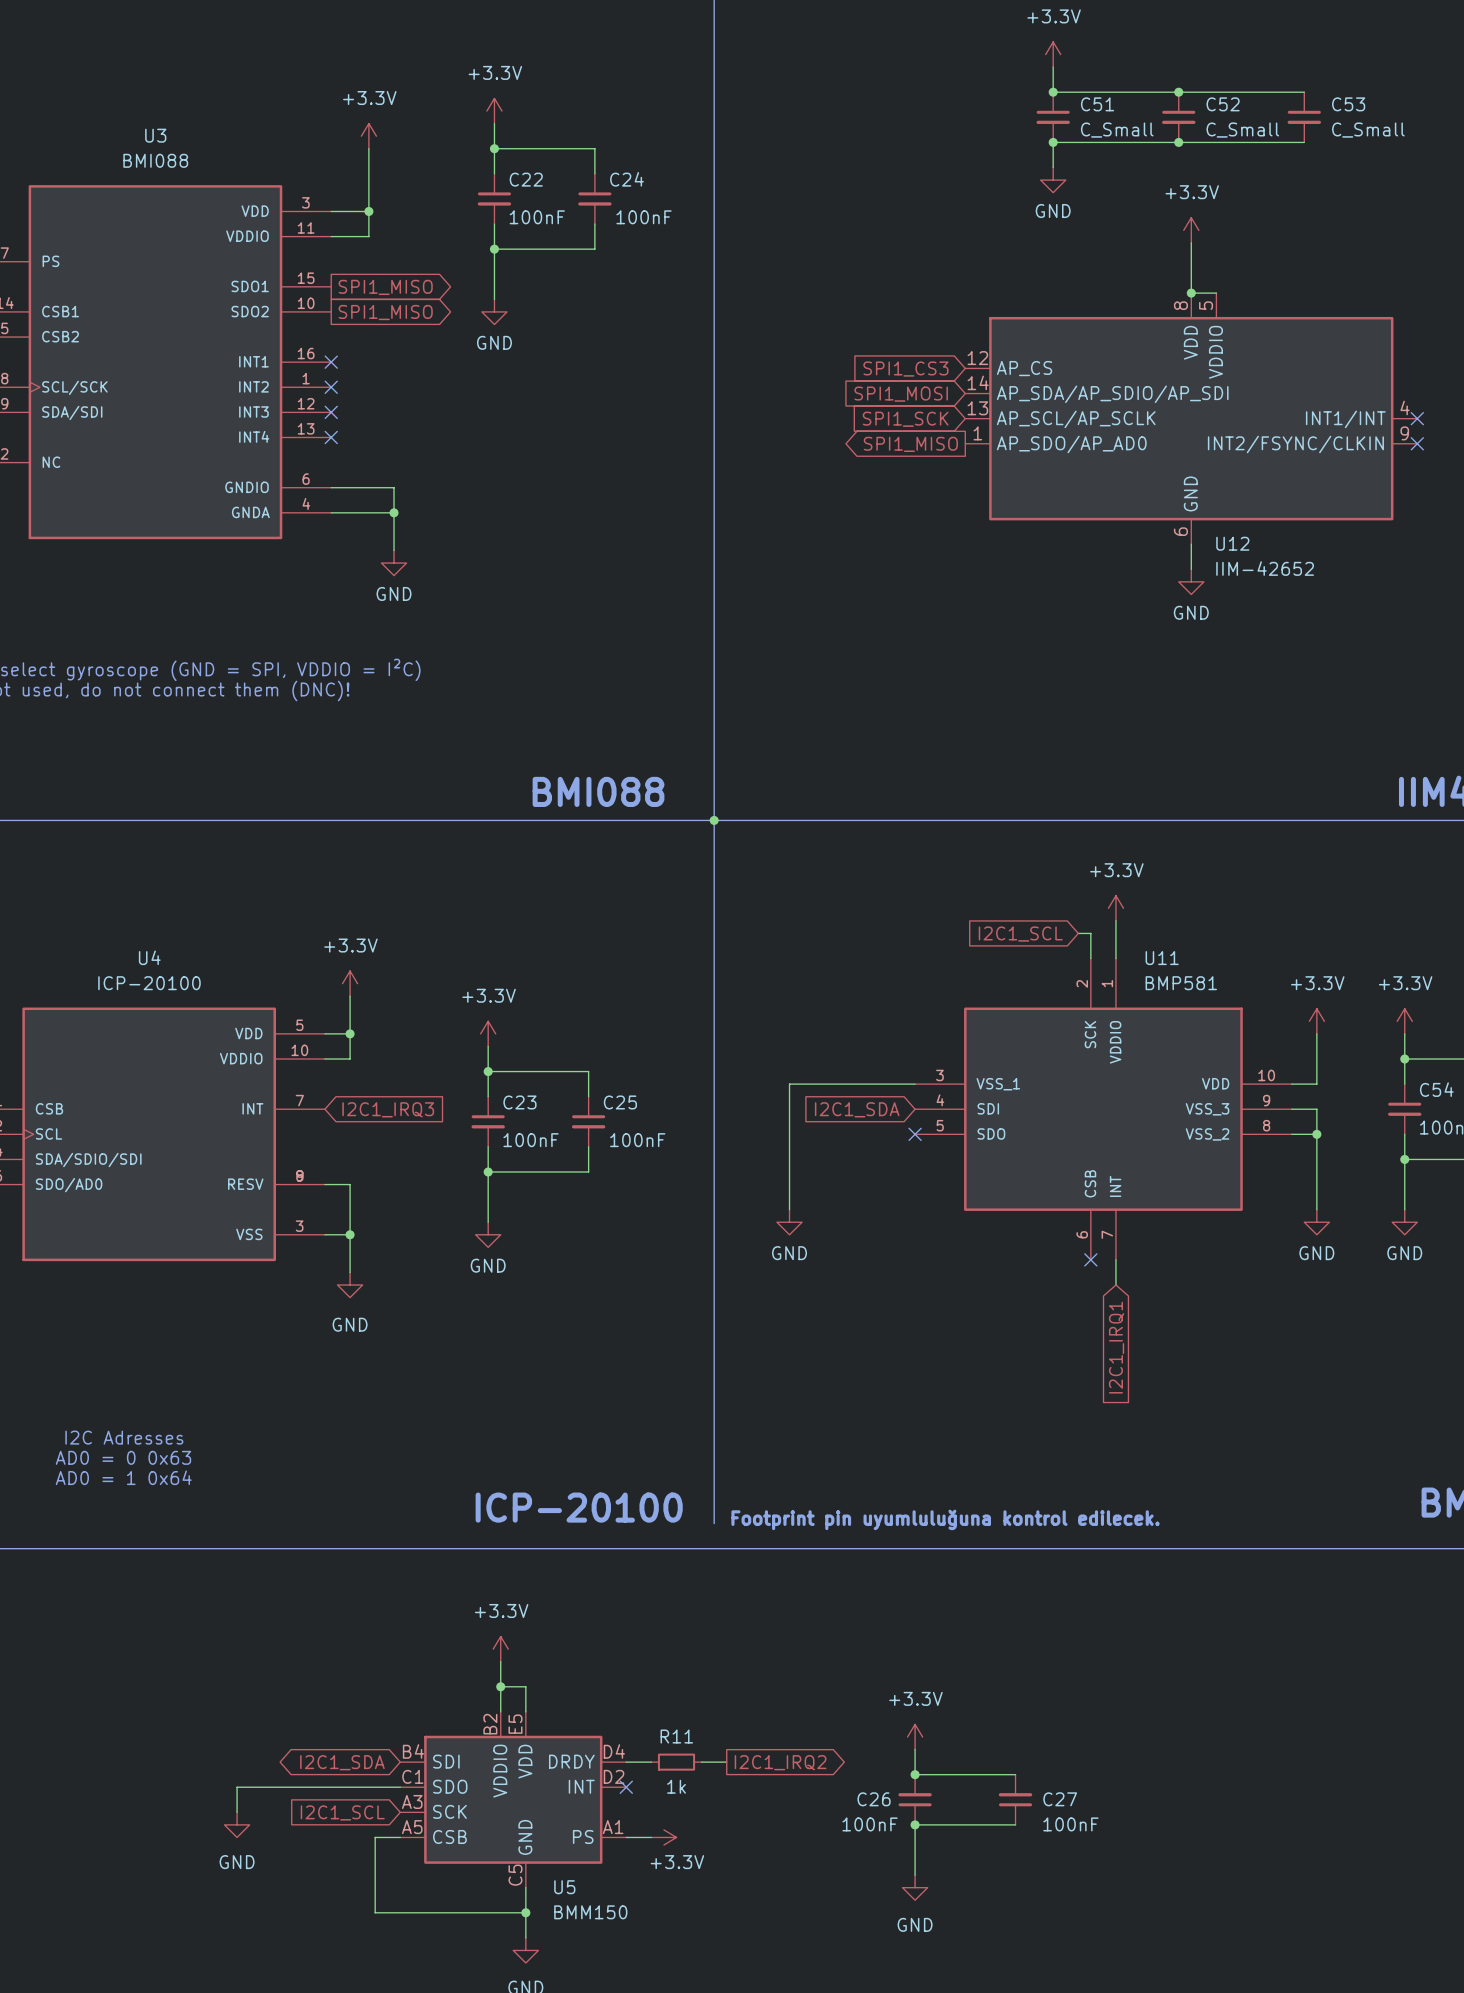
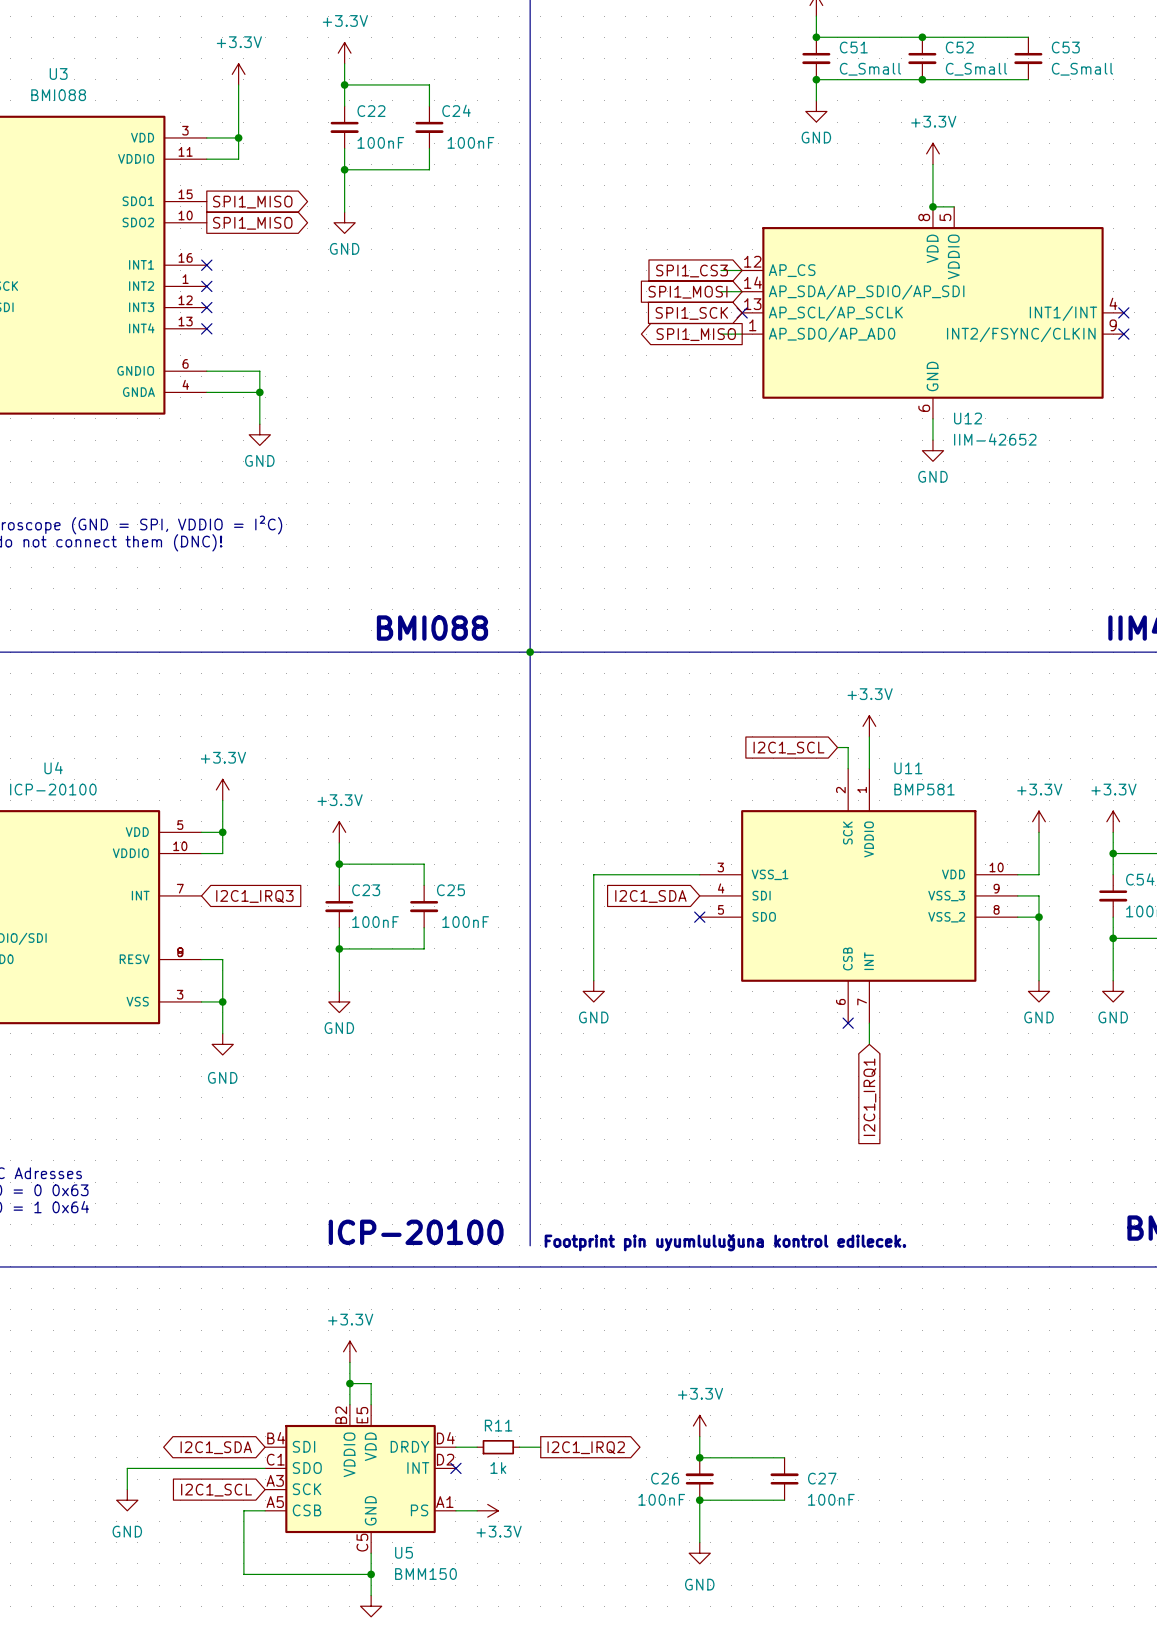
wire: none -> (720, 270) (742, 270)
wire: none -> (720, 291) (742, 291)
no-connect mark: none -> (742, 312)
wire: none -> (720, 334) (742, 334)

